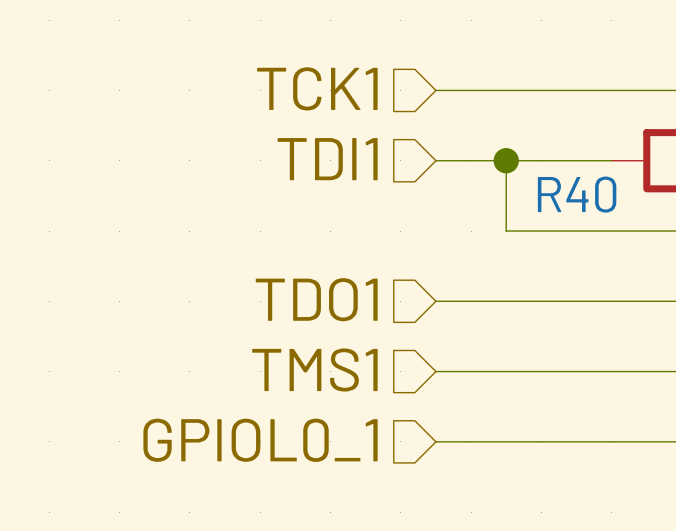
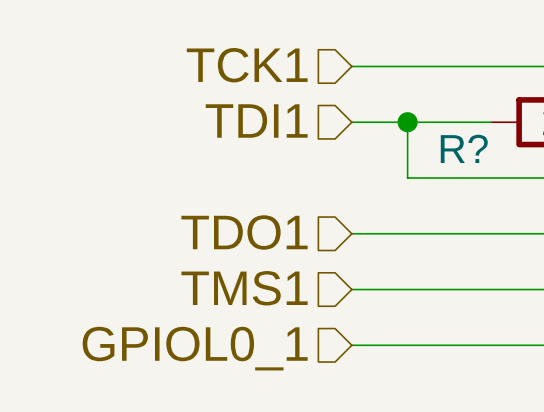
R40 name: R40 (577, 194) -> R? (464, 148)

